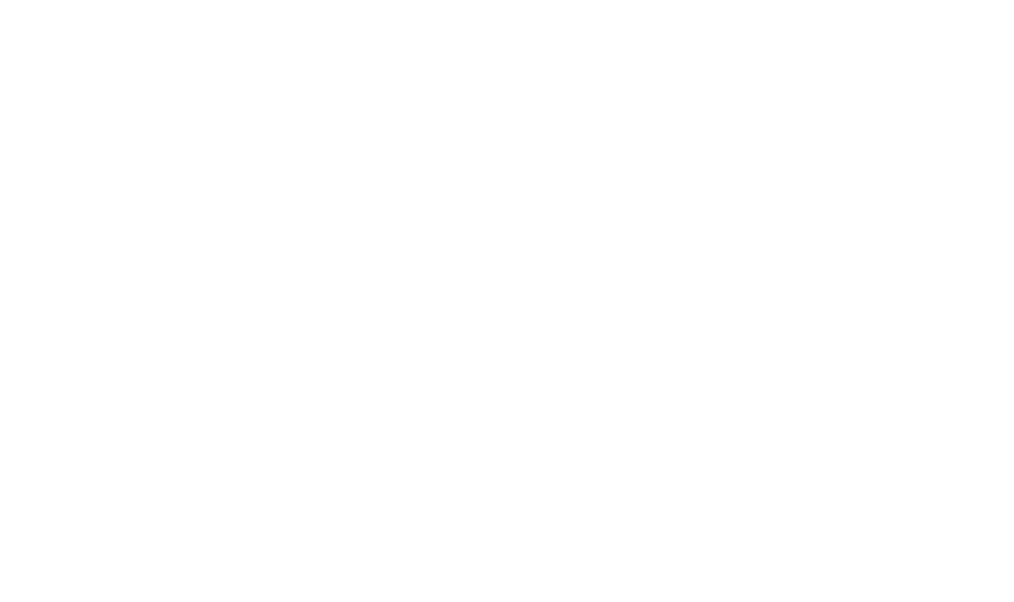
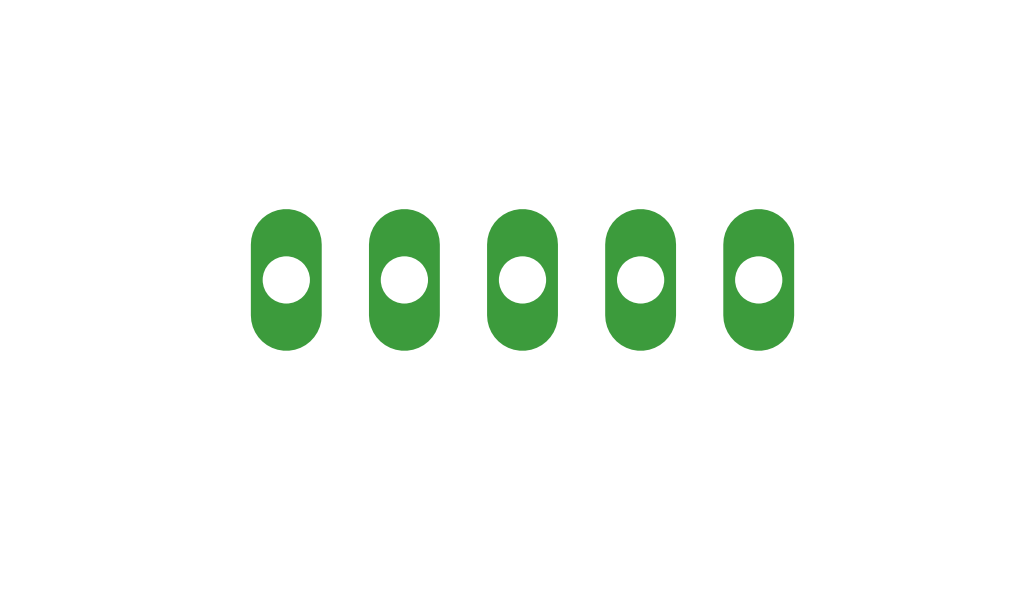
part: none -> (522, 279)

